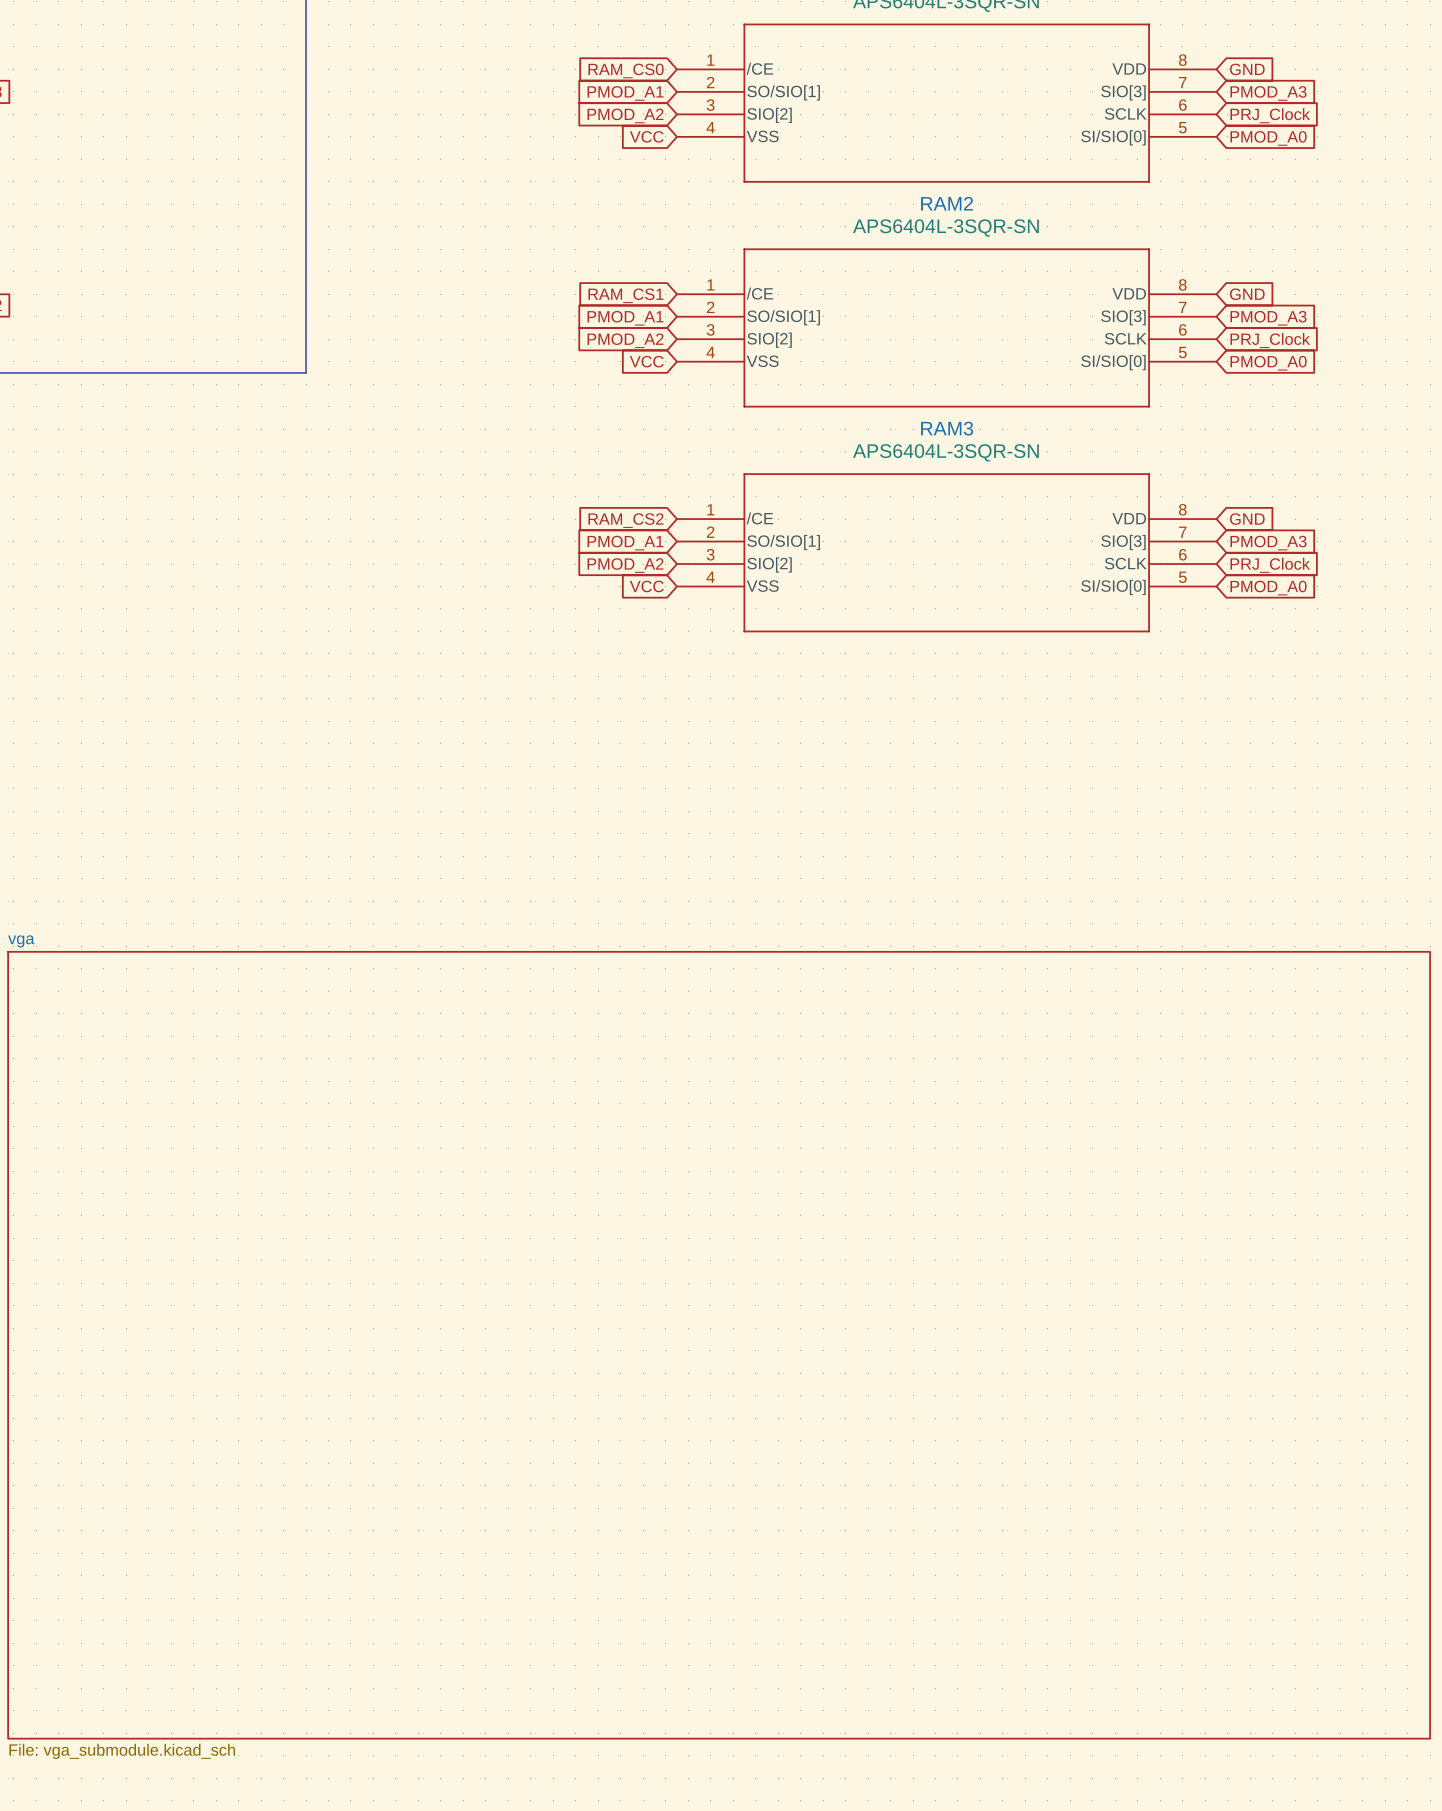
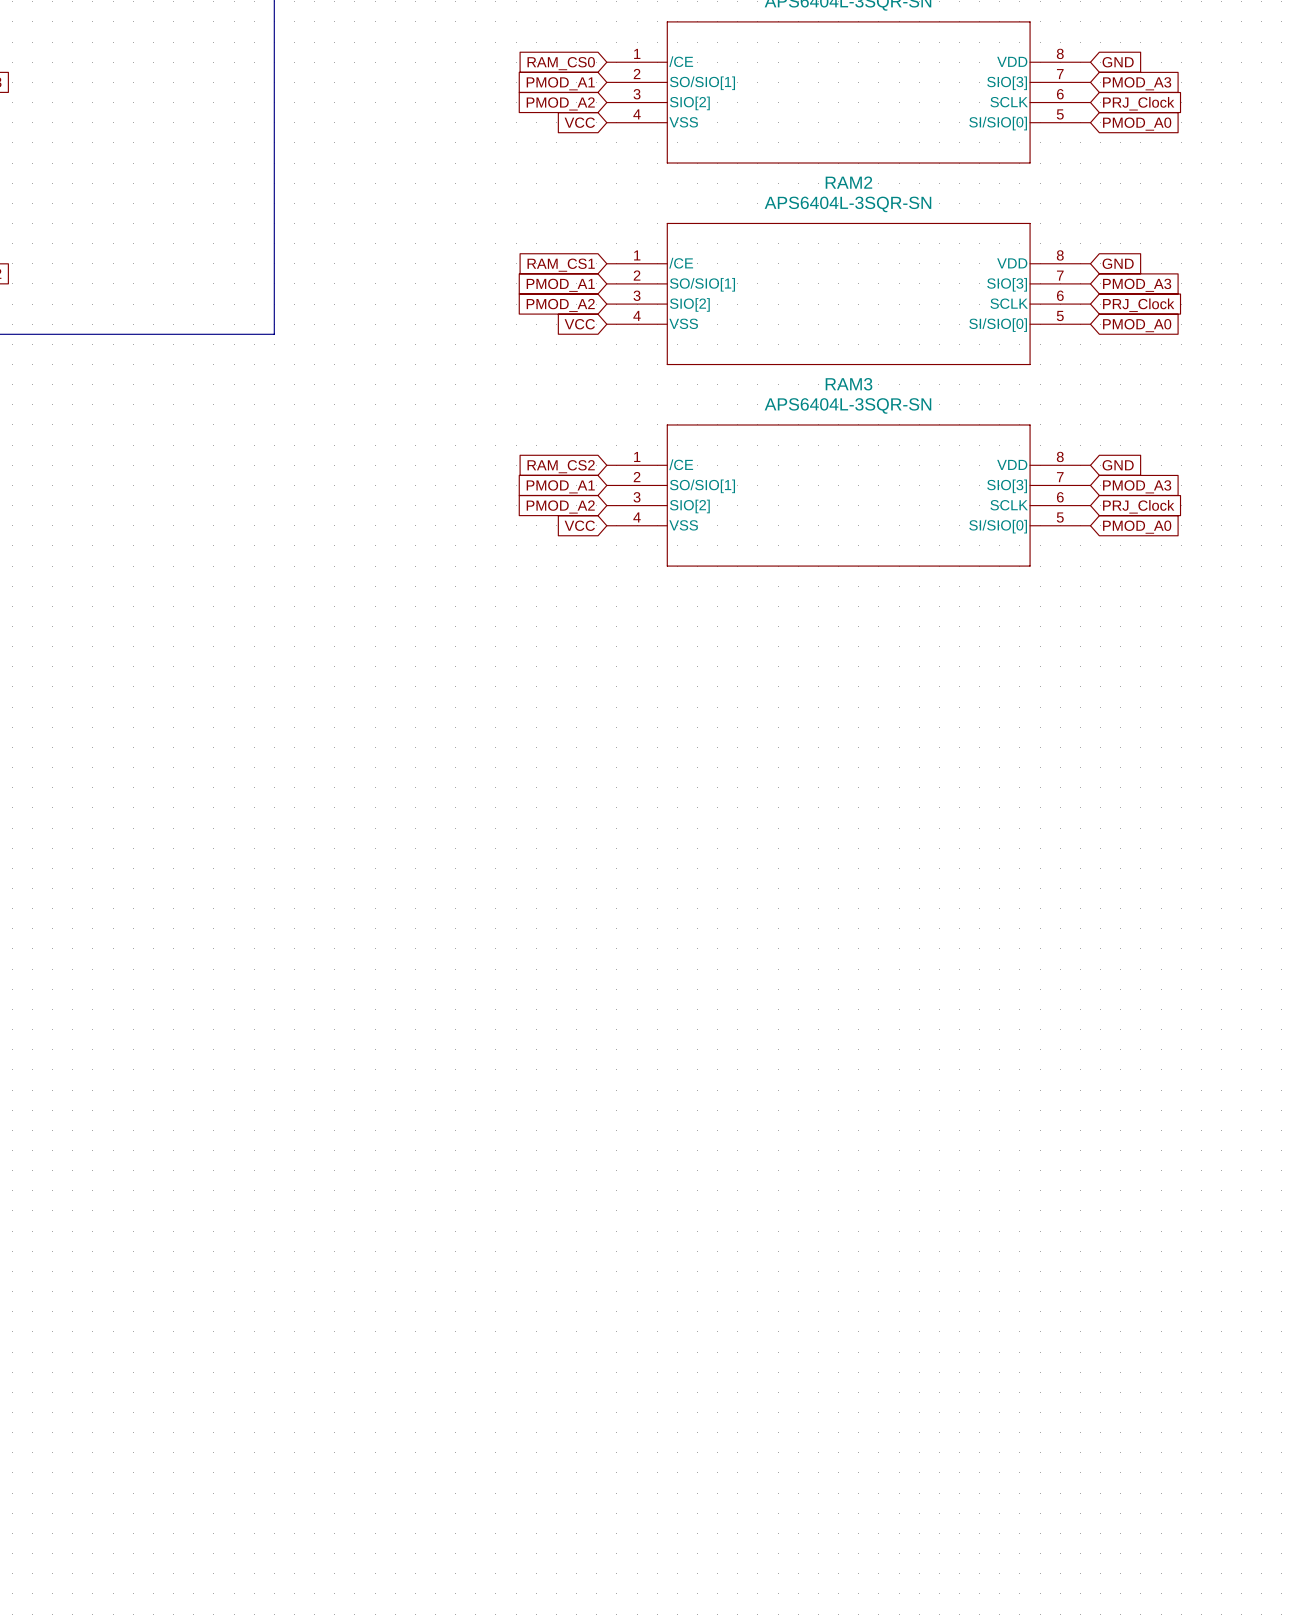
sheet vga: File: vga_submodule.kicad_sch (719, 1345) -> none

